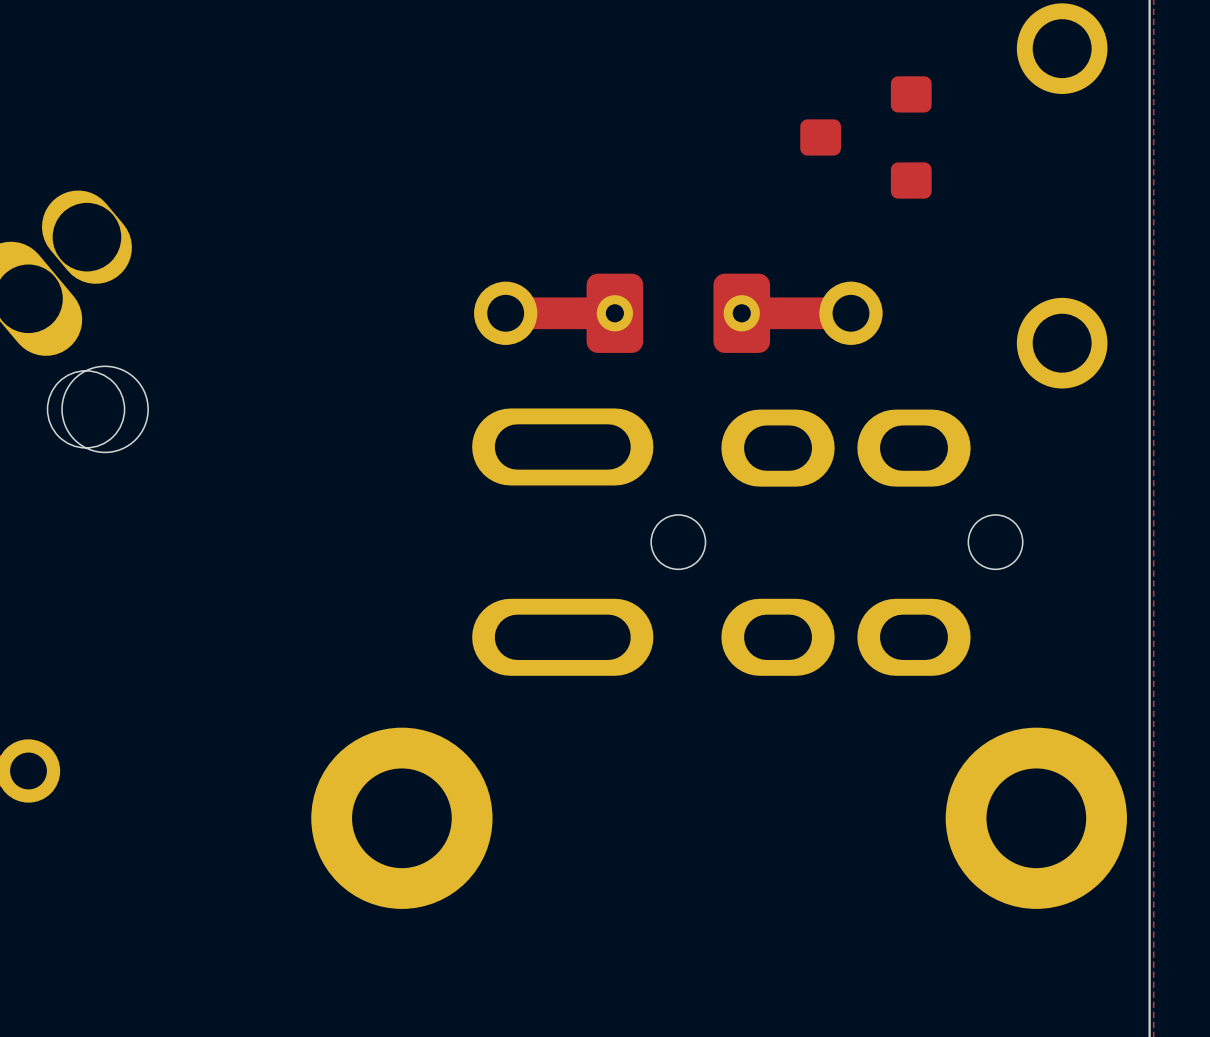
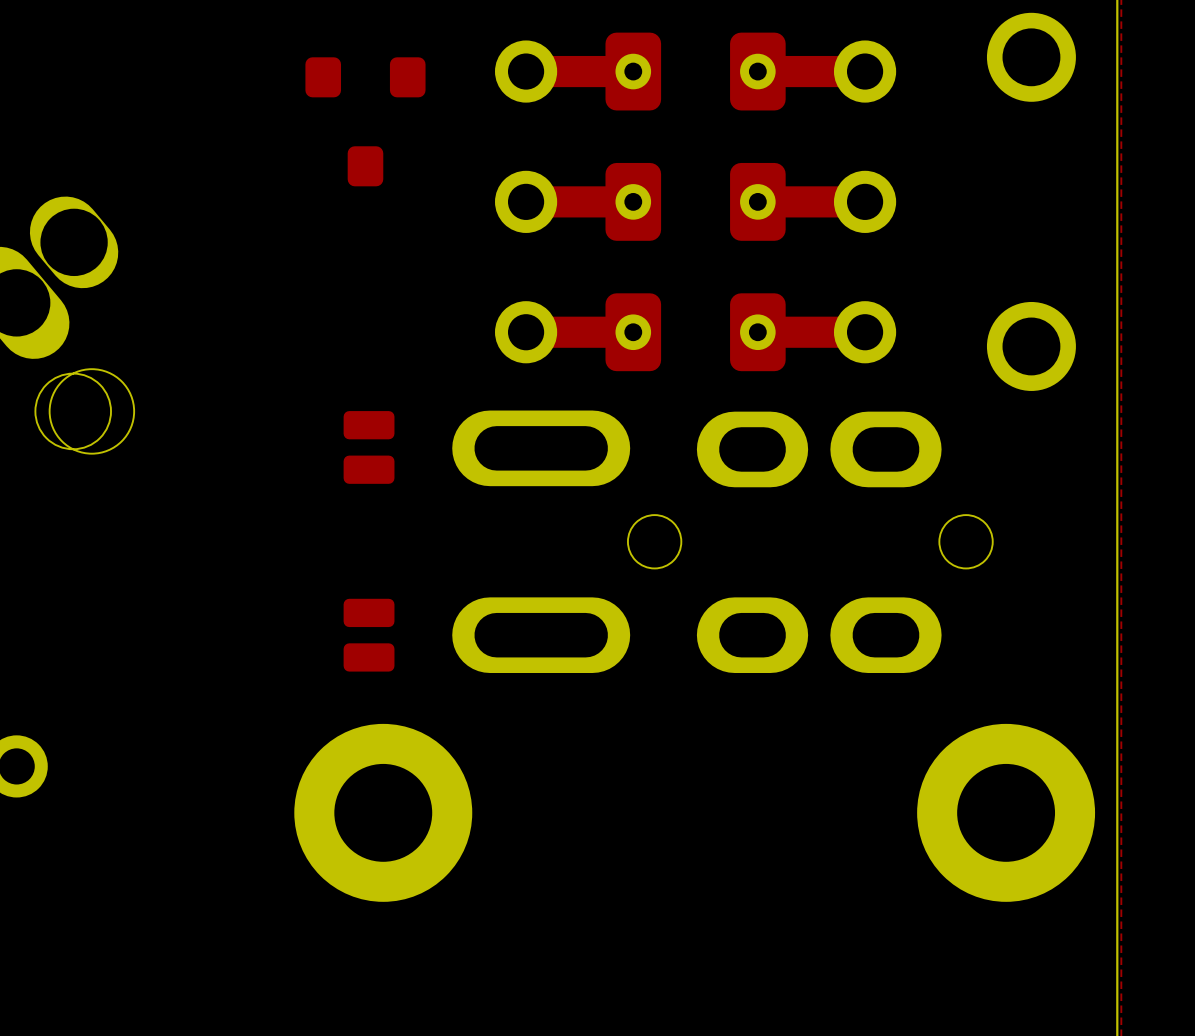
part: none -> (695, 71)
part rotation: 0° (865, 137) -> 90° counterclockwise (365, 121)
part position: (865, 137) -> (365, 121)
part: none -> (695, 201)
part position: (678, 313) -> (695, 332)
part: none -> (369, 447)
part: none -> (369, 635)

